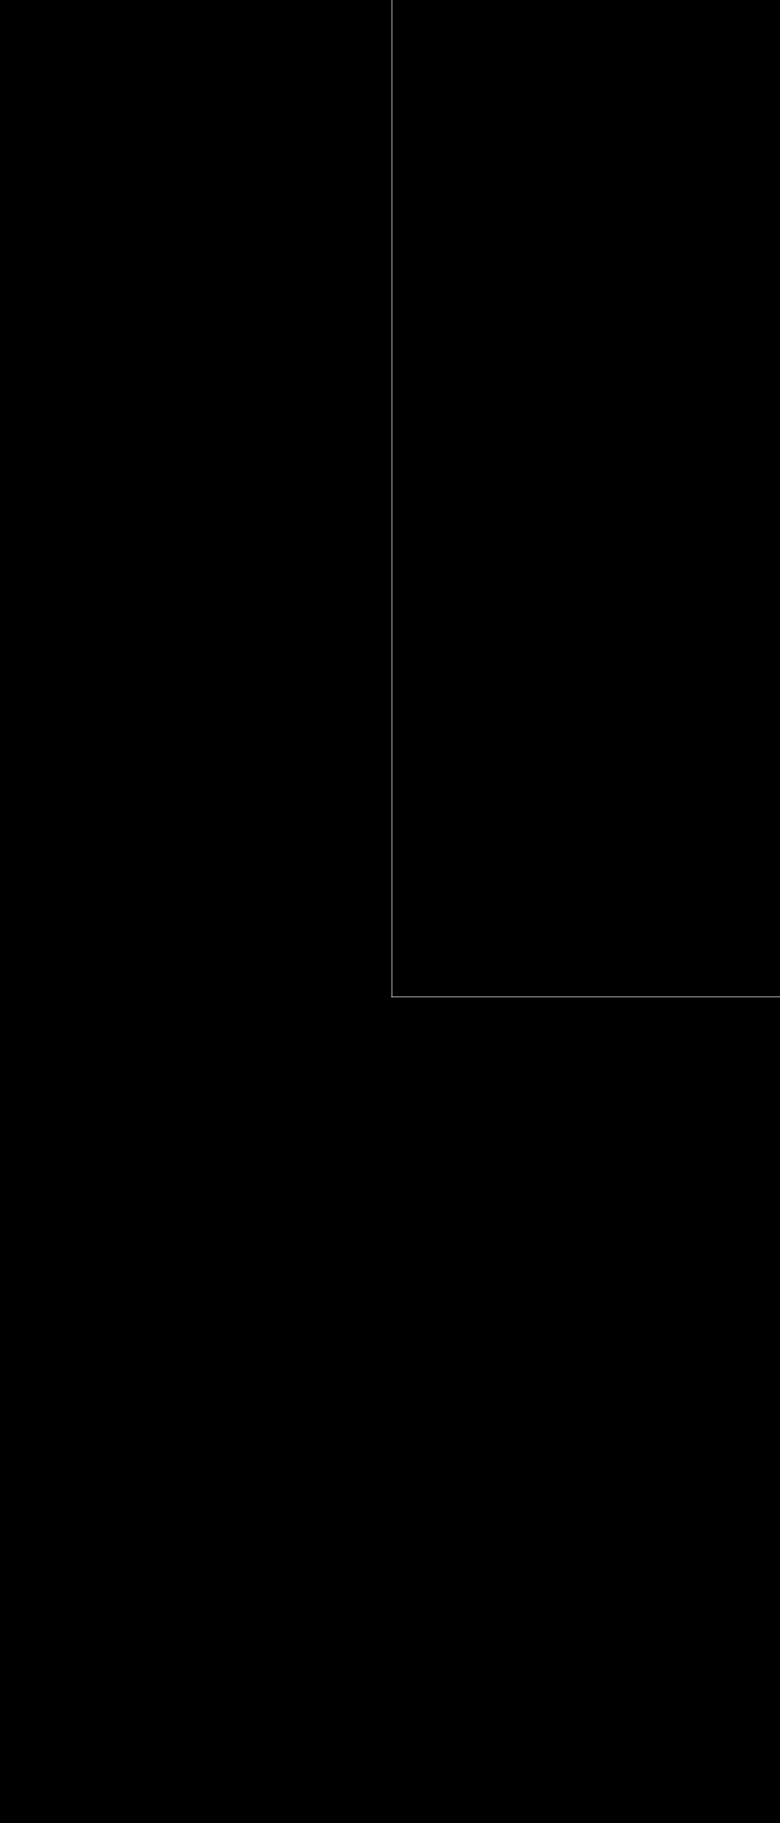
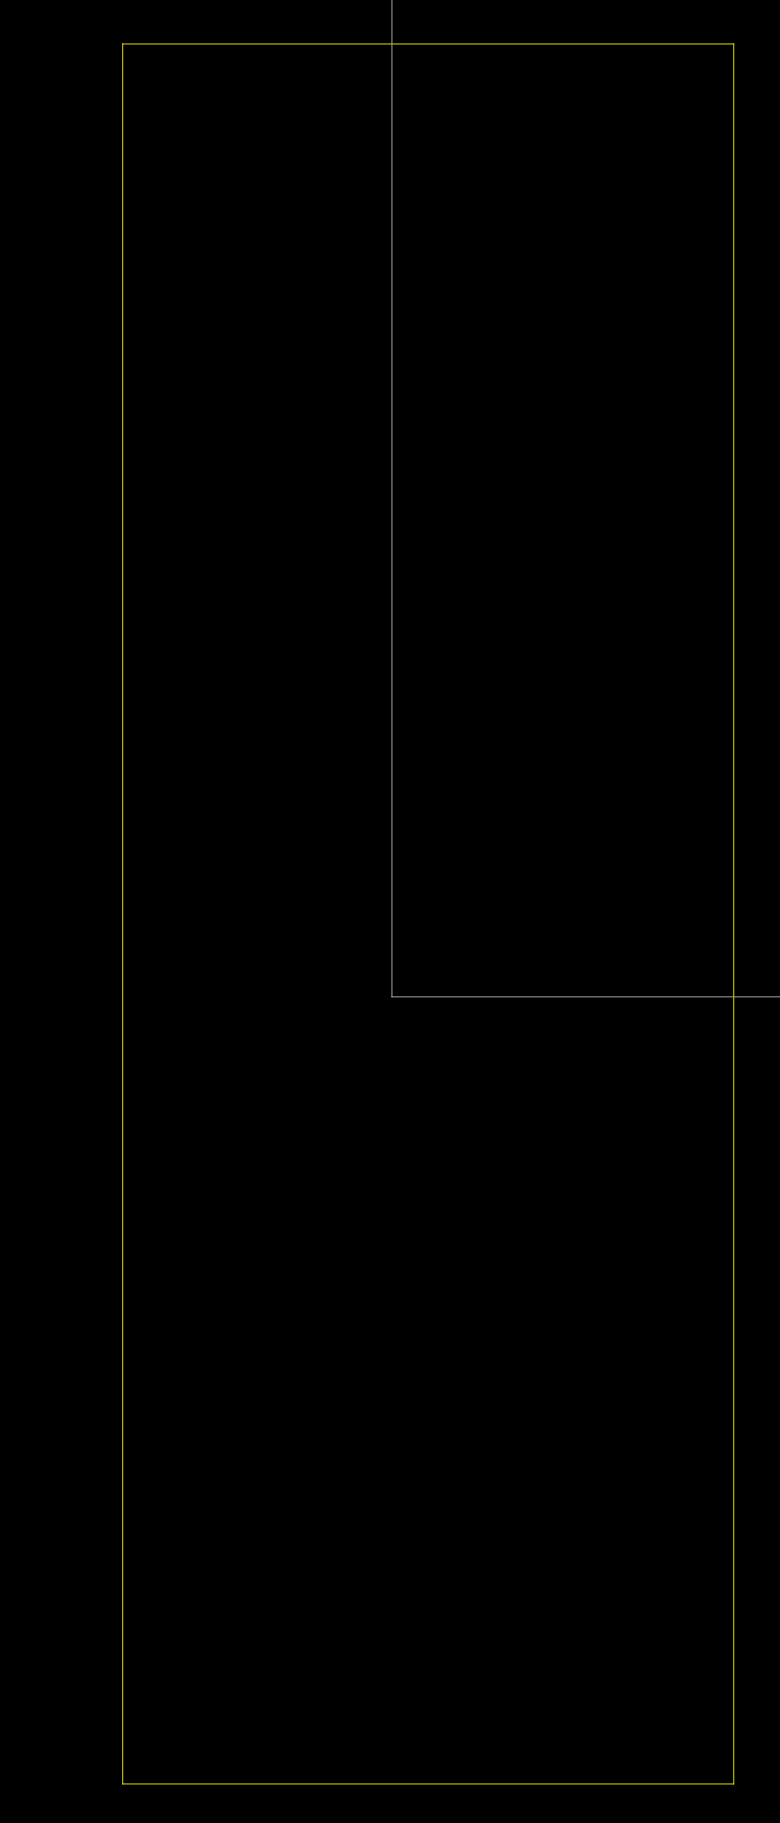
board edge: none -> (733, 43) (733, 1783) (122, 1783) (122, 43) (733, 43)

